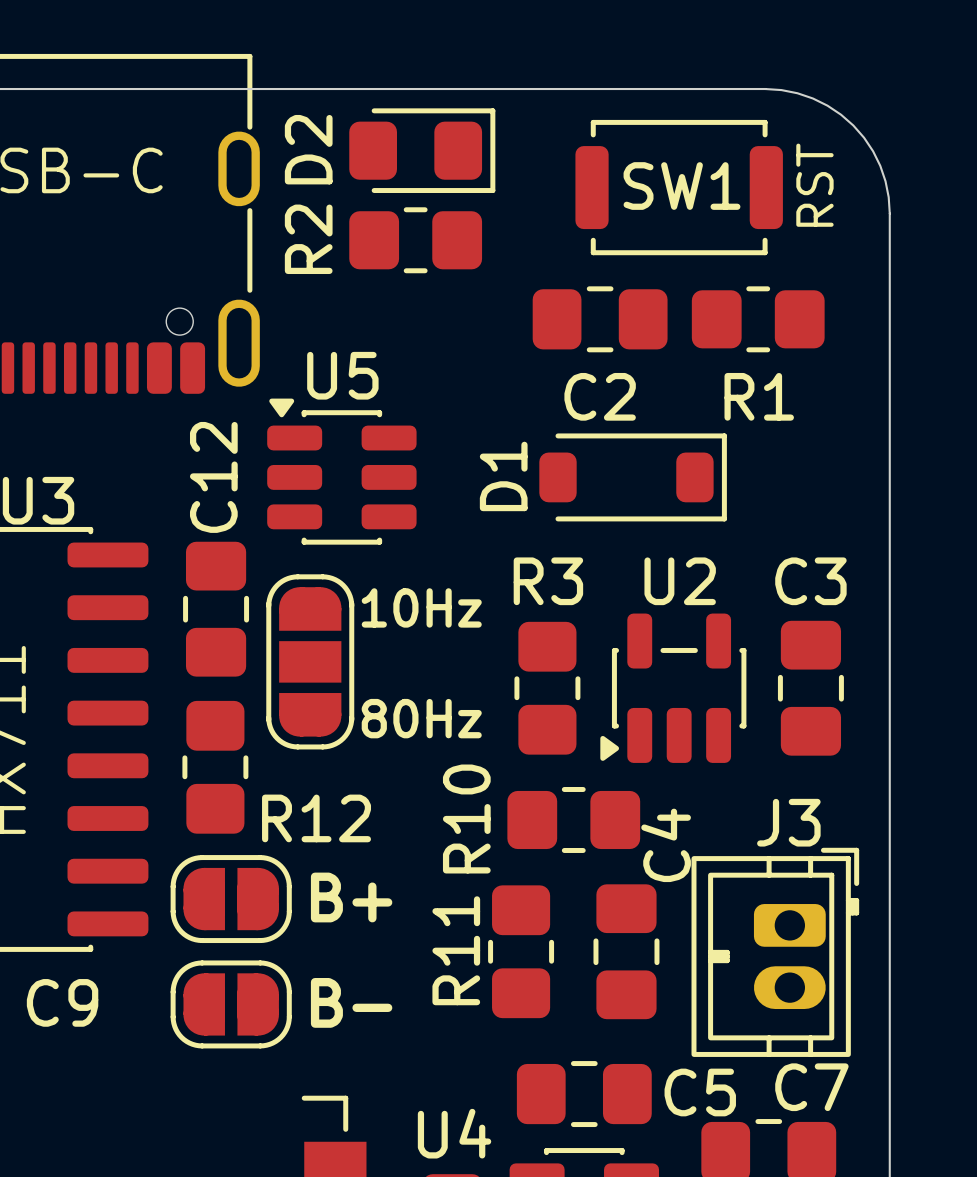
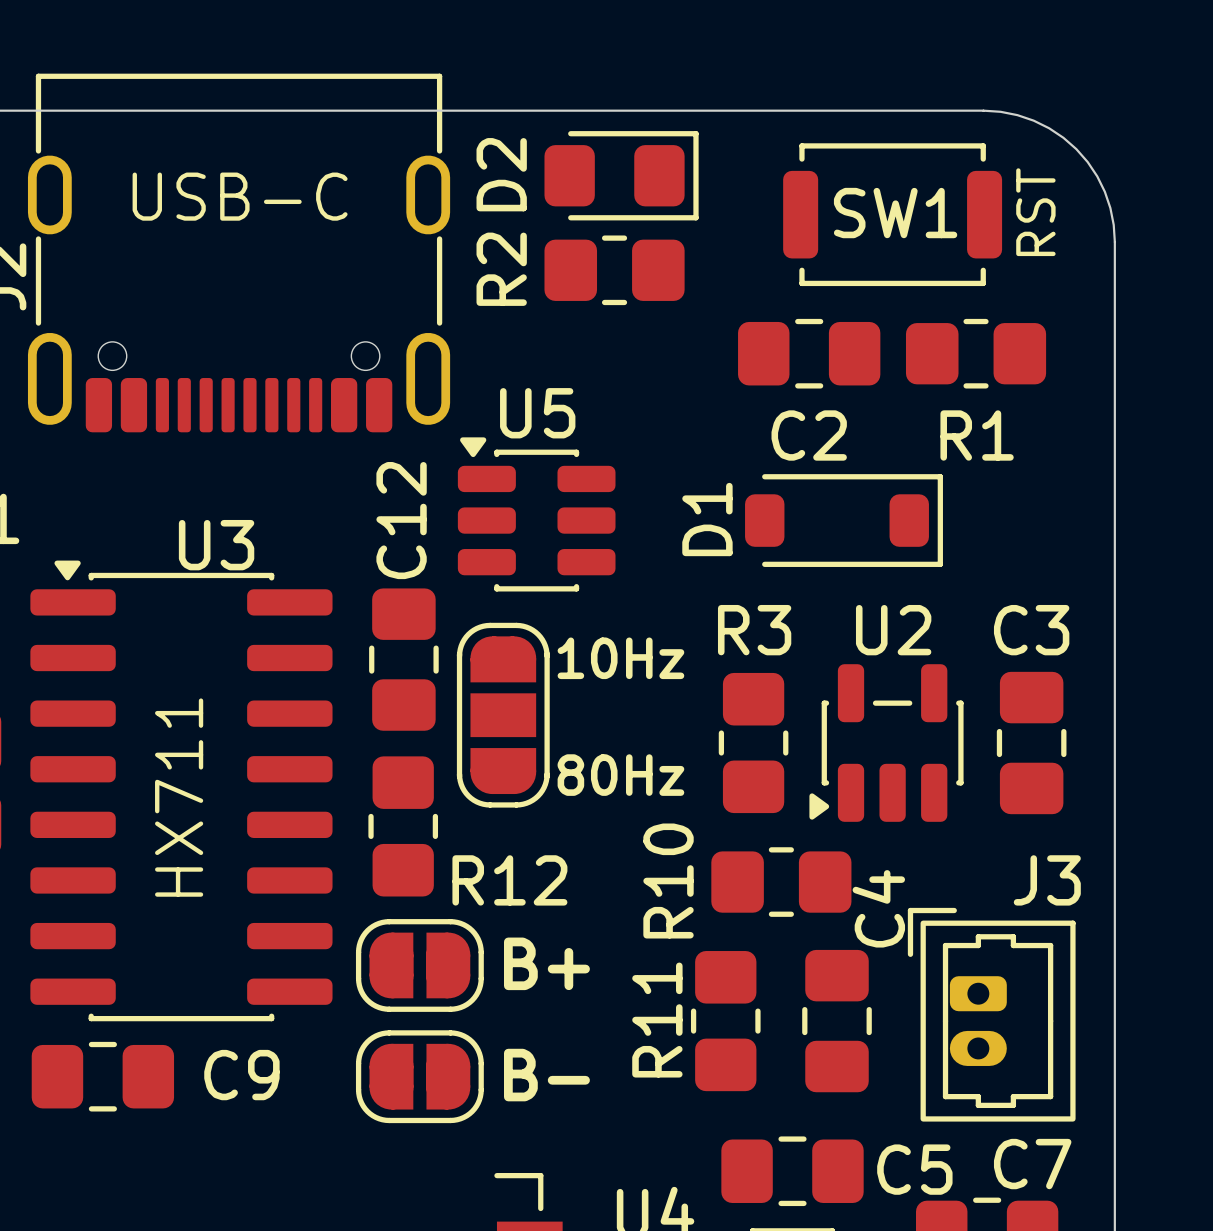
J3 name position: J3 (788, 822) -> J3 (1047, 880)
J3 footprint: [691, 847, 860, 1057] -> [907, 907, 1076, 1122]

